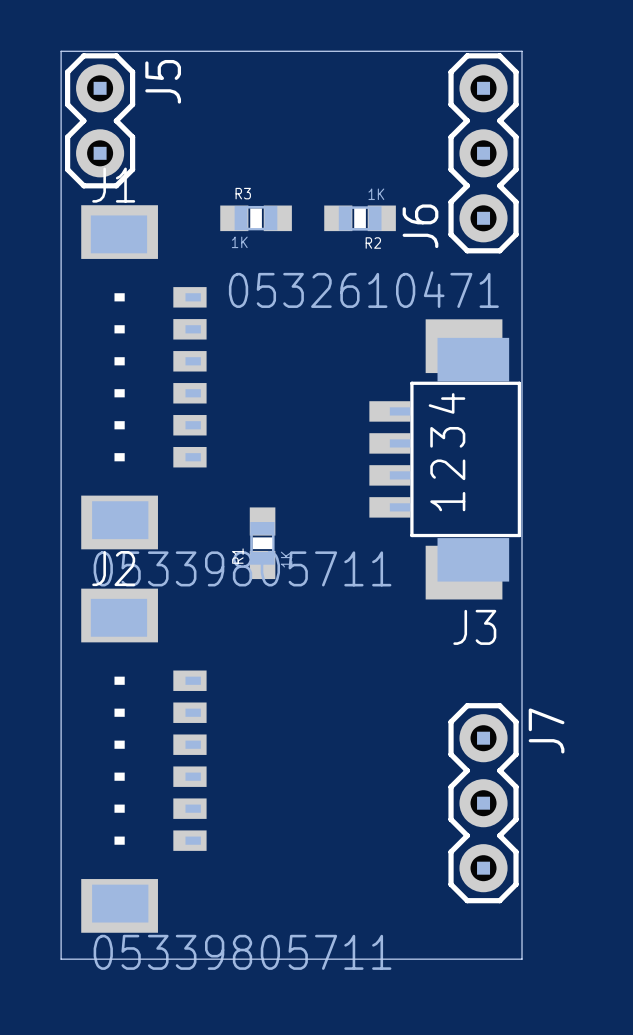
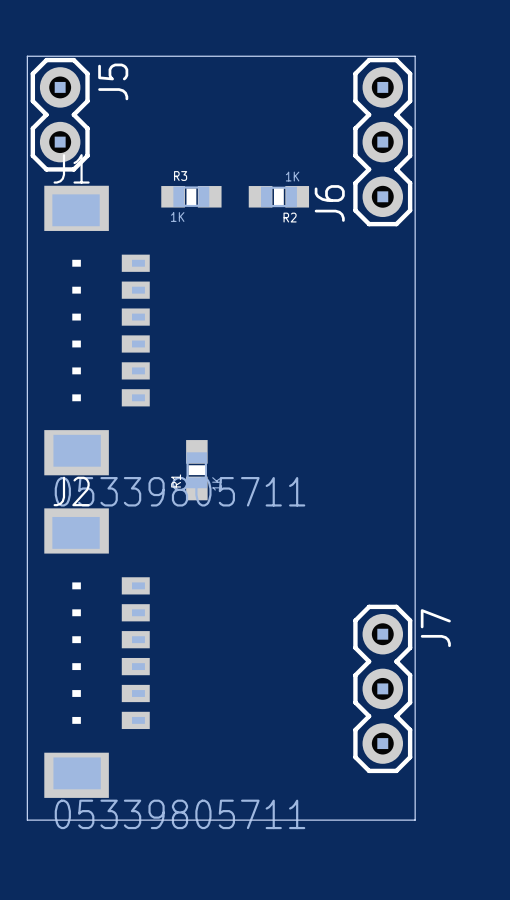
J3: 0532610471 (445, 459) -> none

